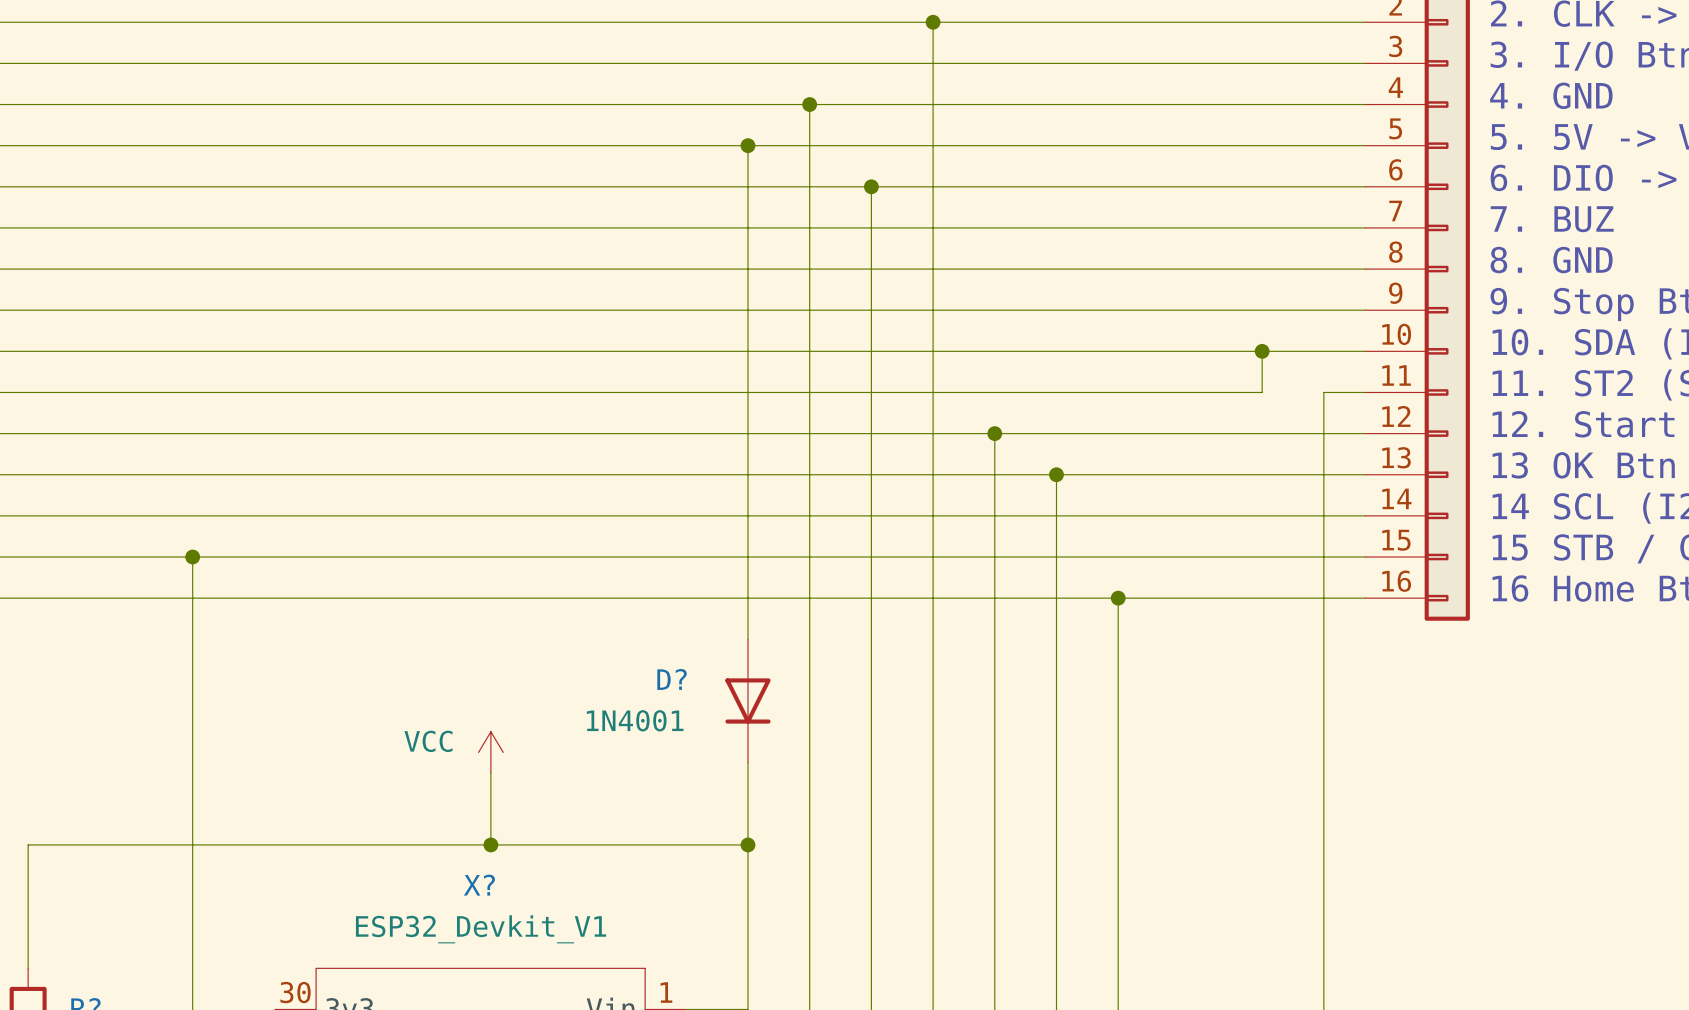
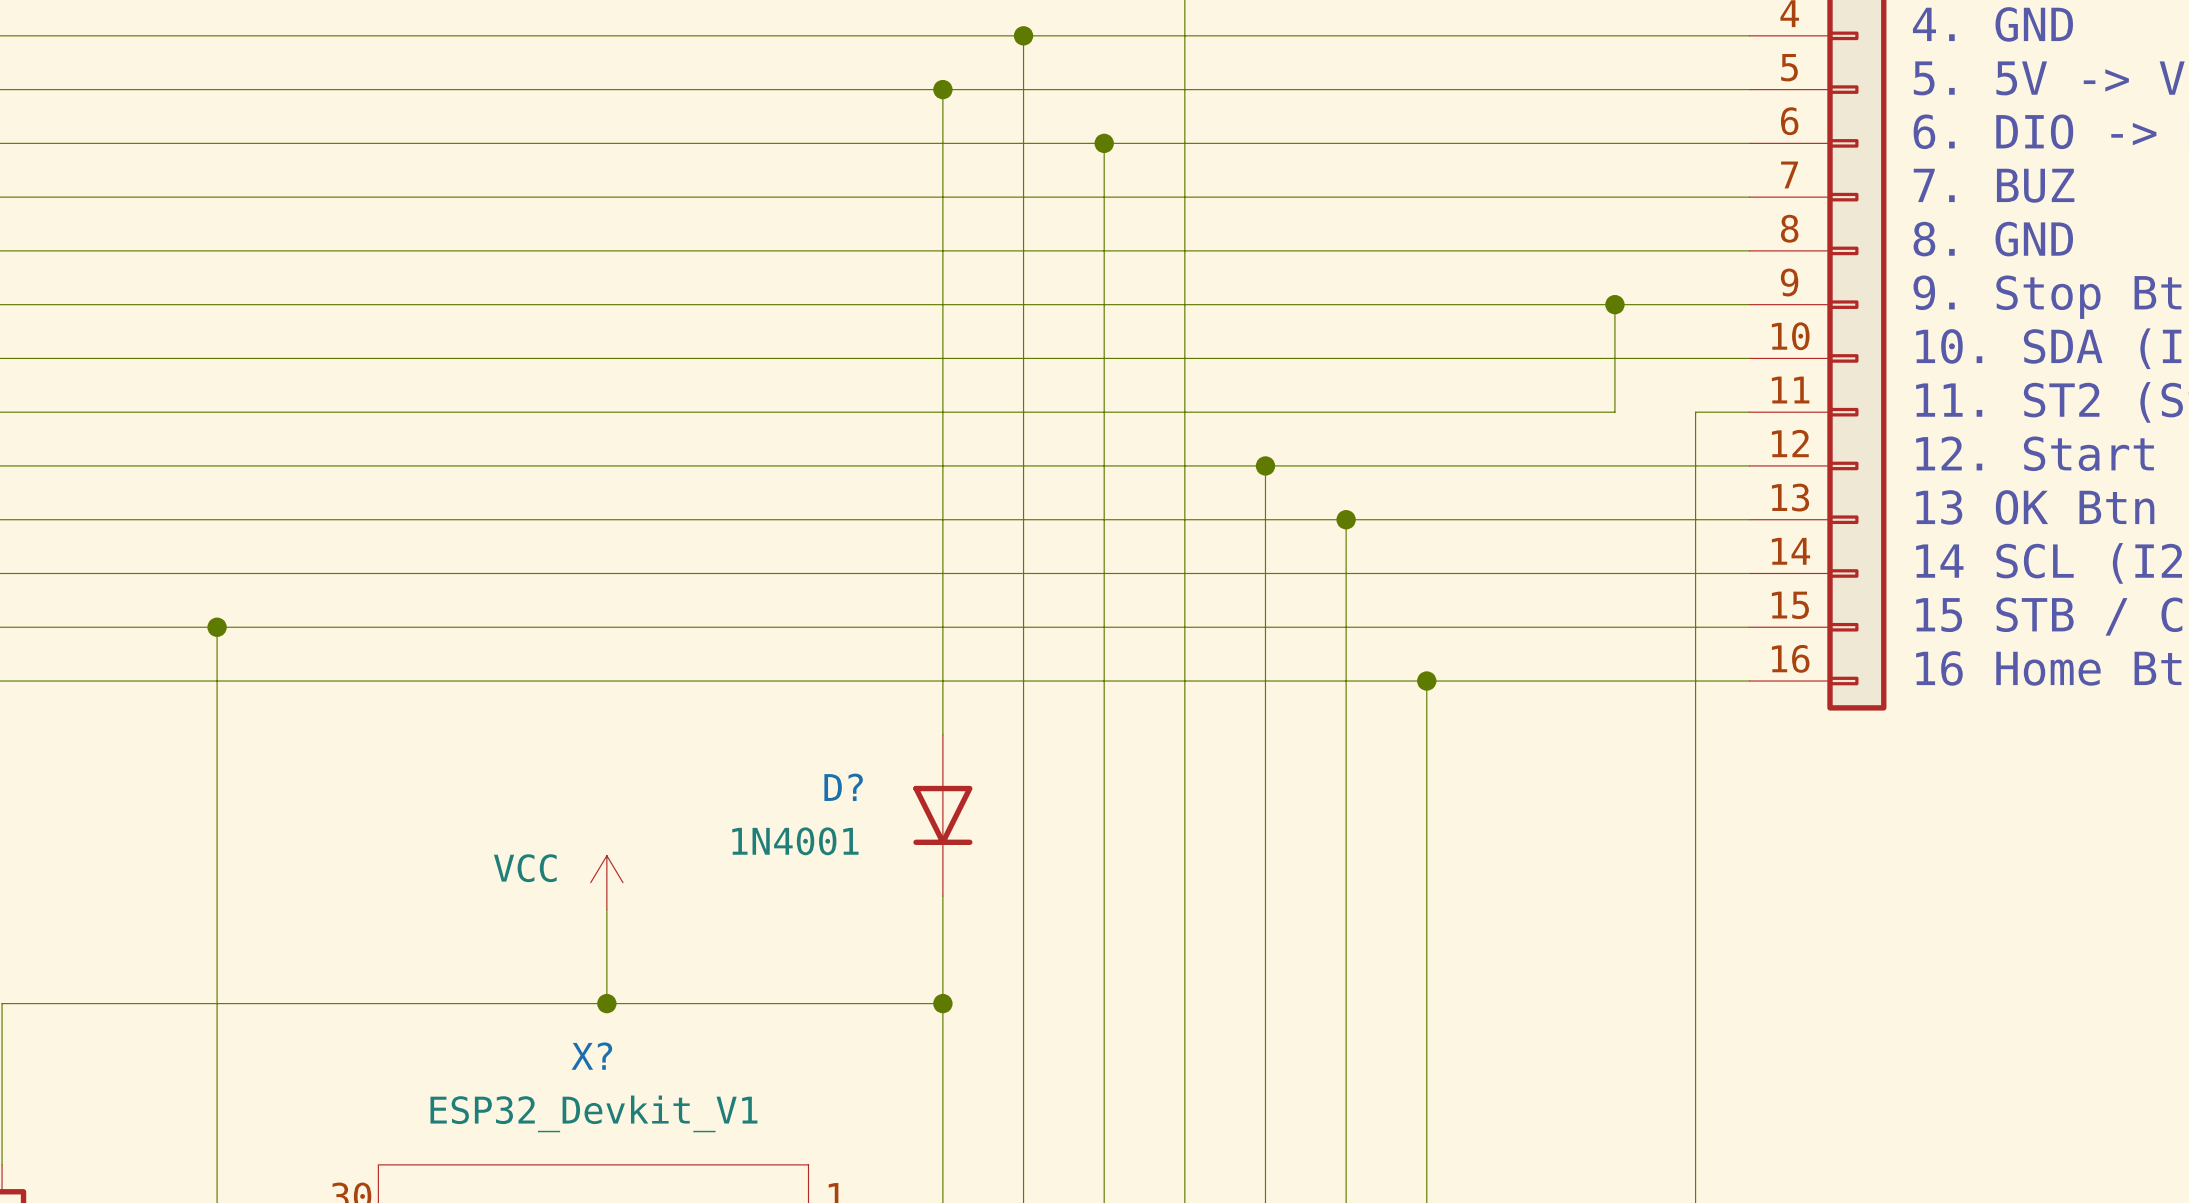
wire: none -> (1614, 304) (1614, 358)
junction position: (1262, 351) -> (1614, 304)

